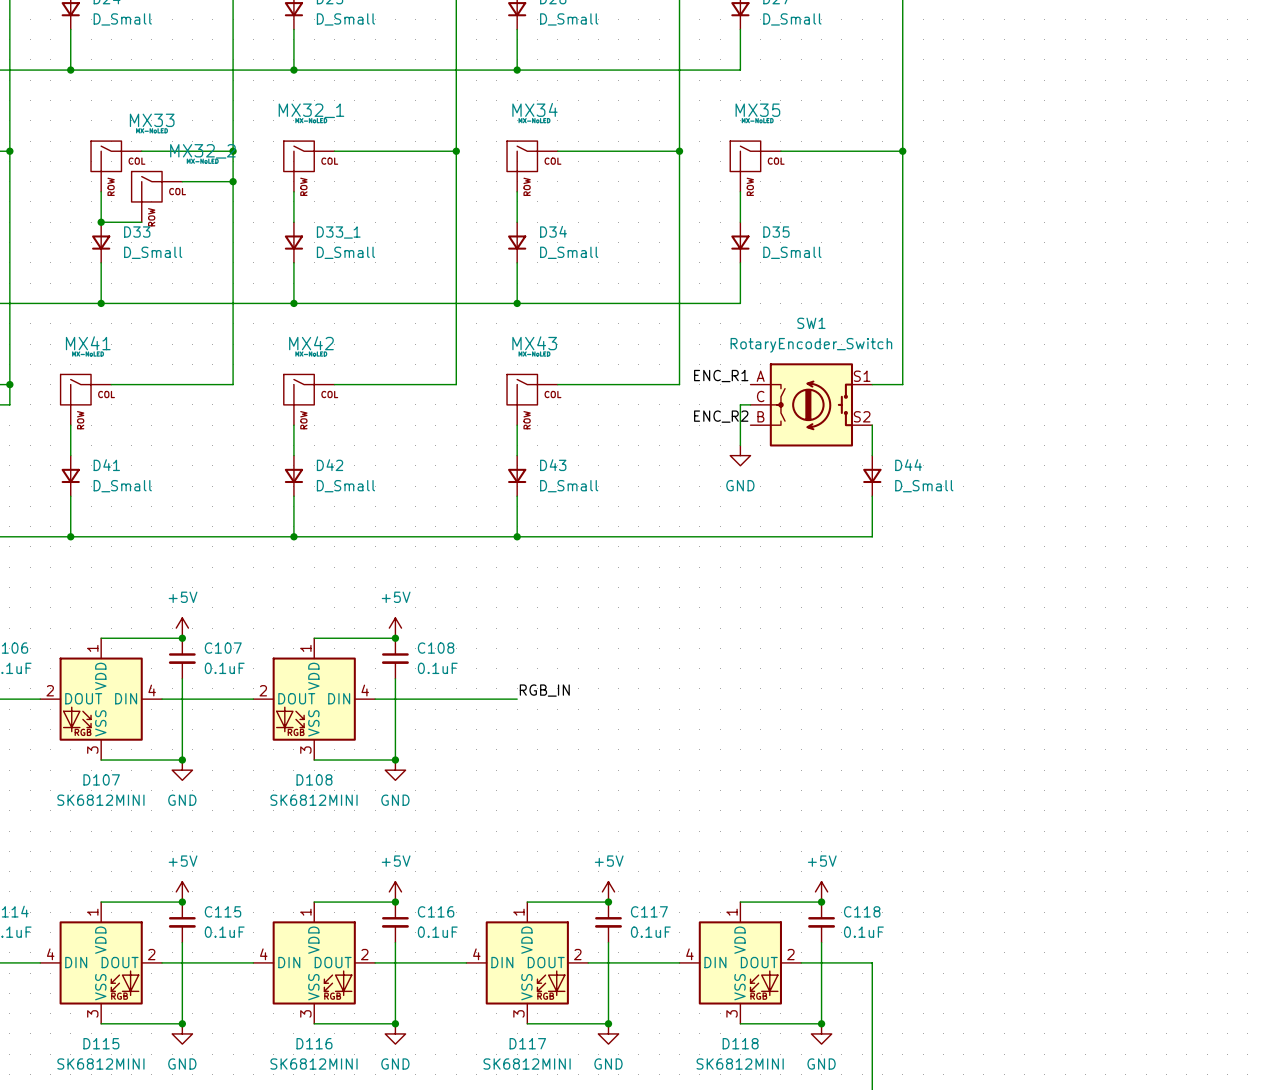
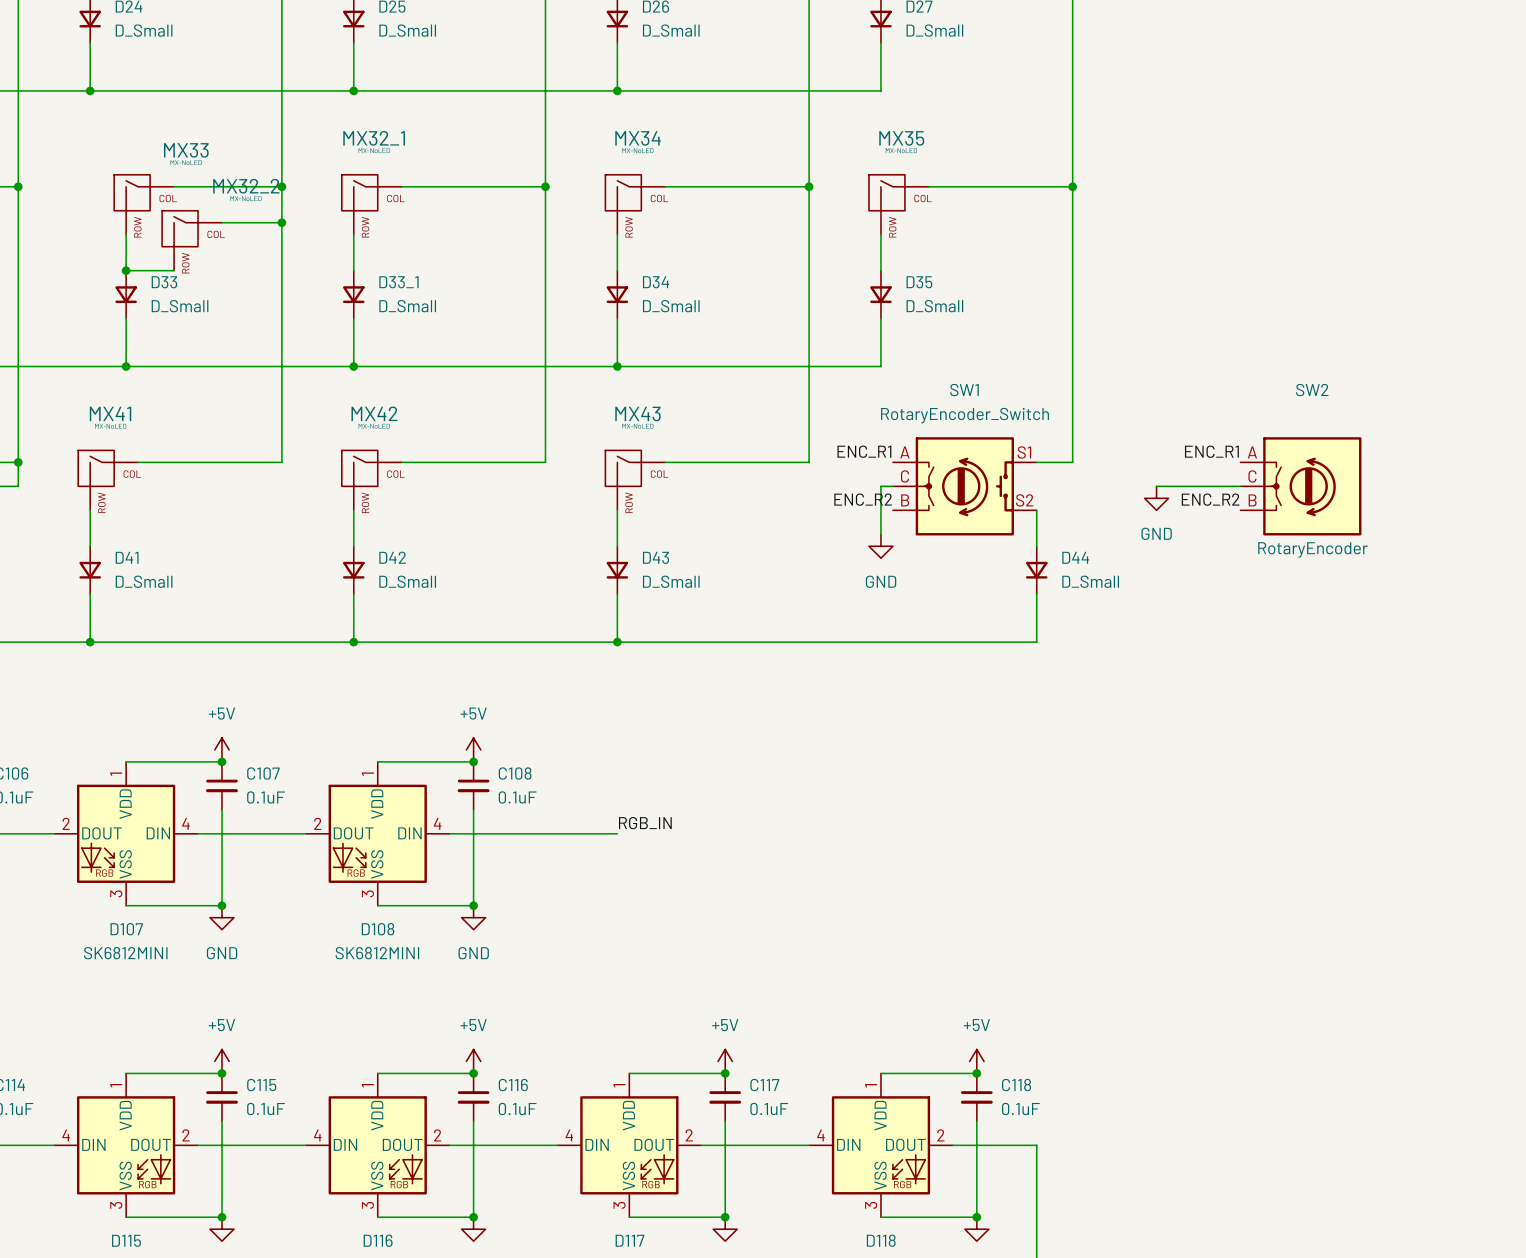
label: none -> ENC_R1 (1211, 451)
wire: none -> (1156, 486) (1240, 486)
SW2: none -> RotaryEncoder (1300, 486)
power symbol: none -> GND (1156, 498)
label: none -> ENC_R2 (1210, 499)

